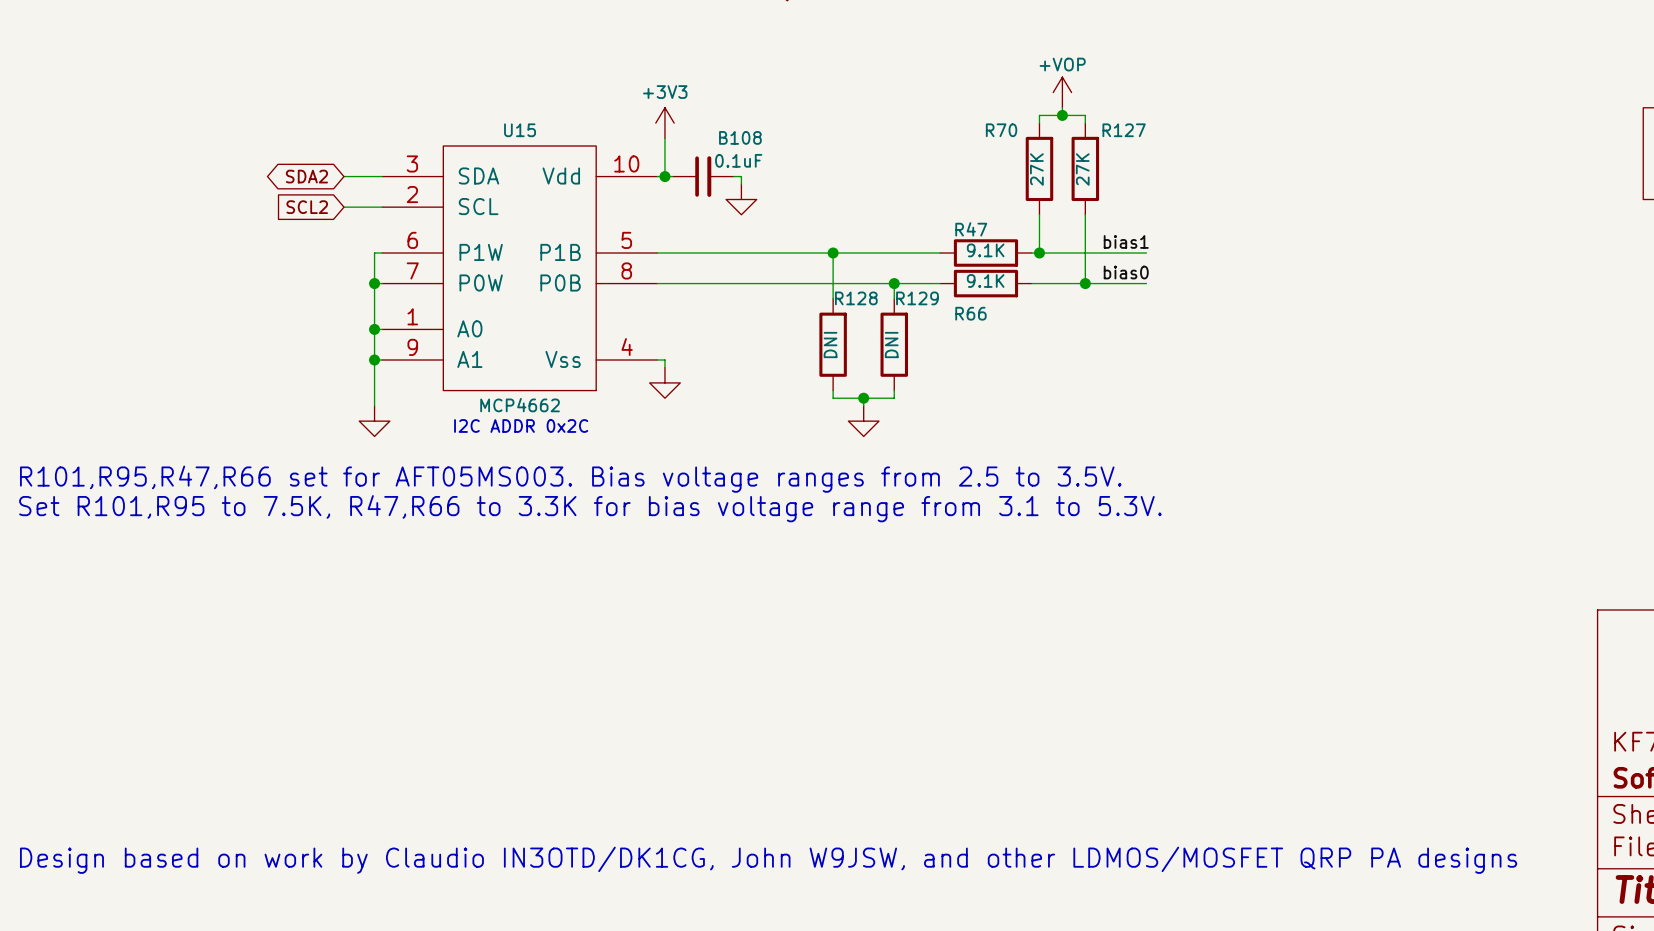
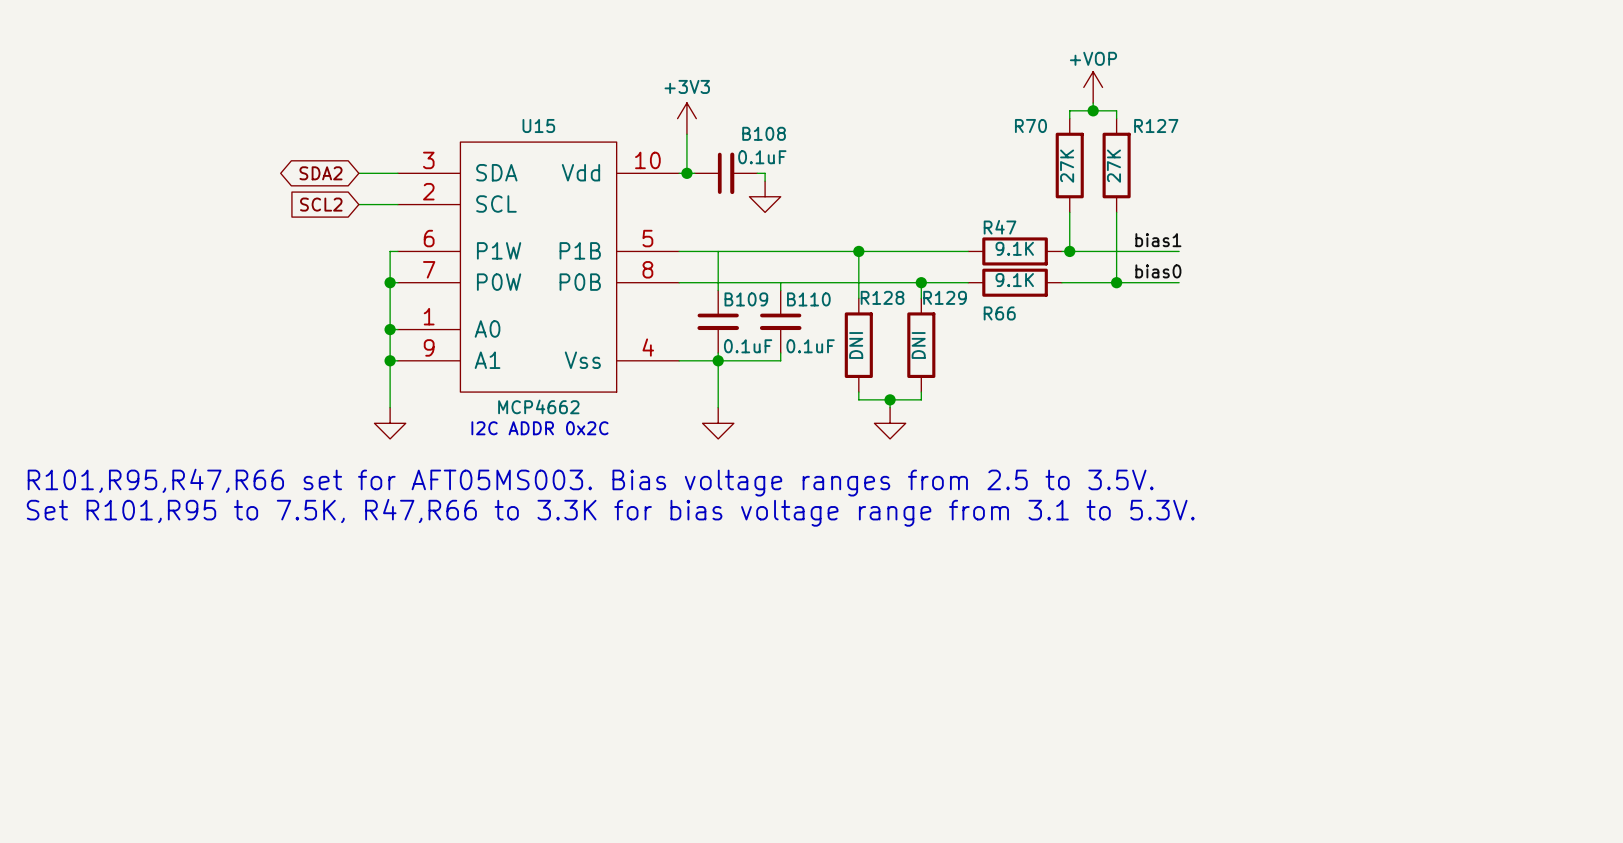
wire: none -> (718, 251) (718, 290)
wire: none -> (780, 282) (780, 290)
B109: none -> 0.1uF (718, 321)
B110: none -> 0.1uF (780, 321)
wire: none -> (718, 353) (718, 407)
wire: (664, 360) (664, 367) -> (686, 360) (780, 360) (780, 353)
junction: none -> (718, 360)
power symbol position: (664, 382) -> (718, 423)

